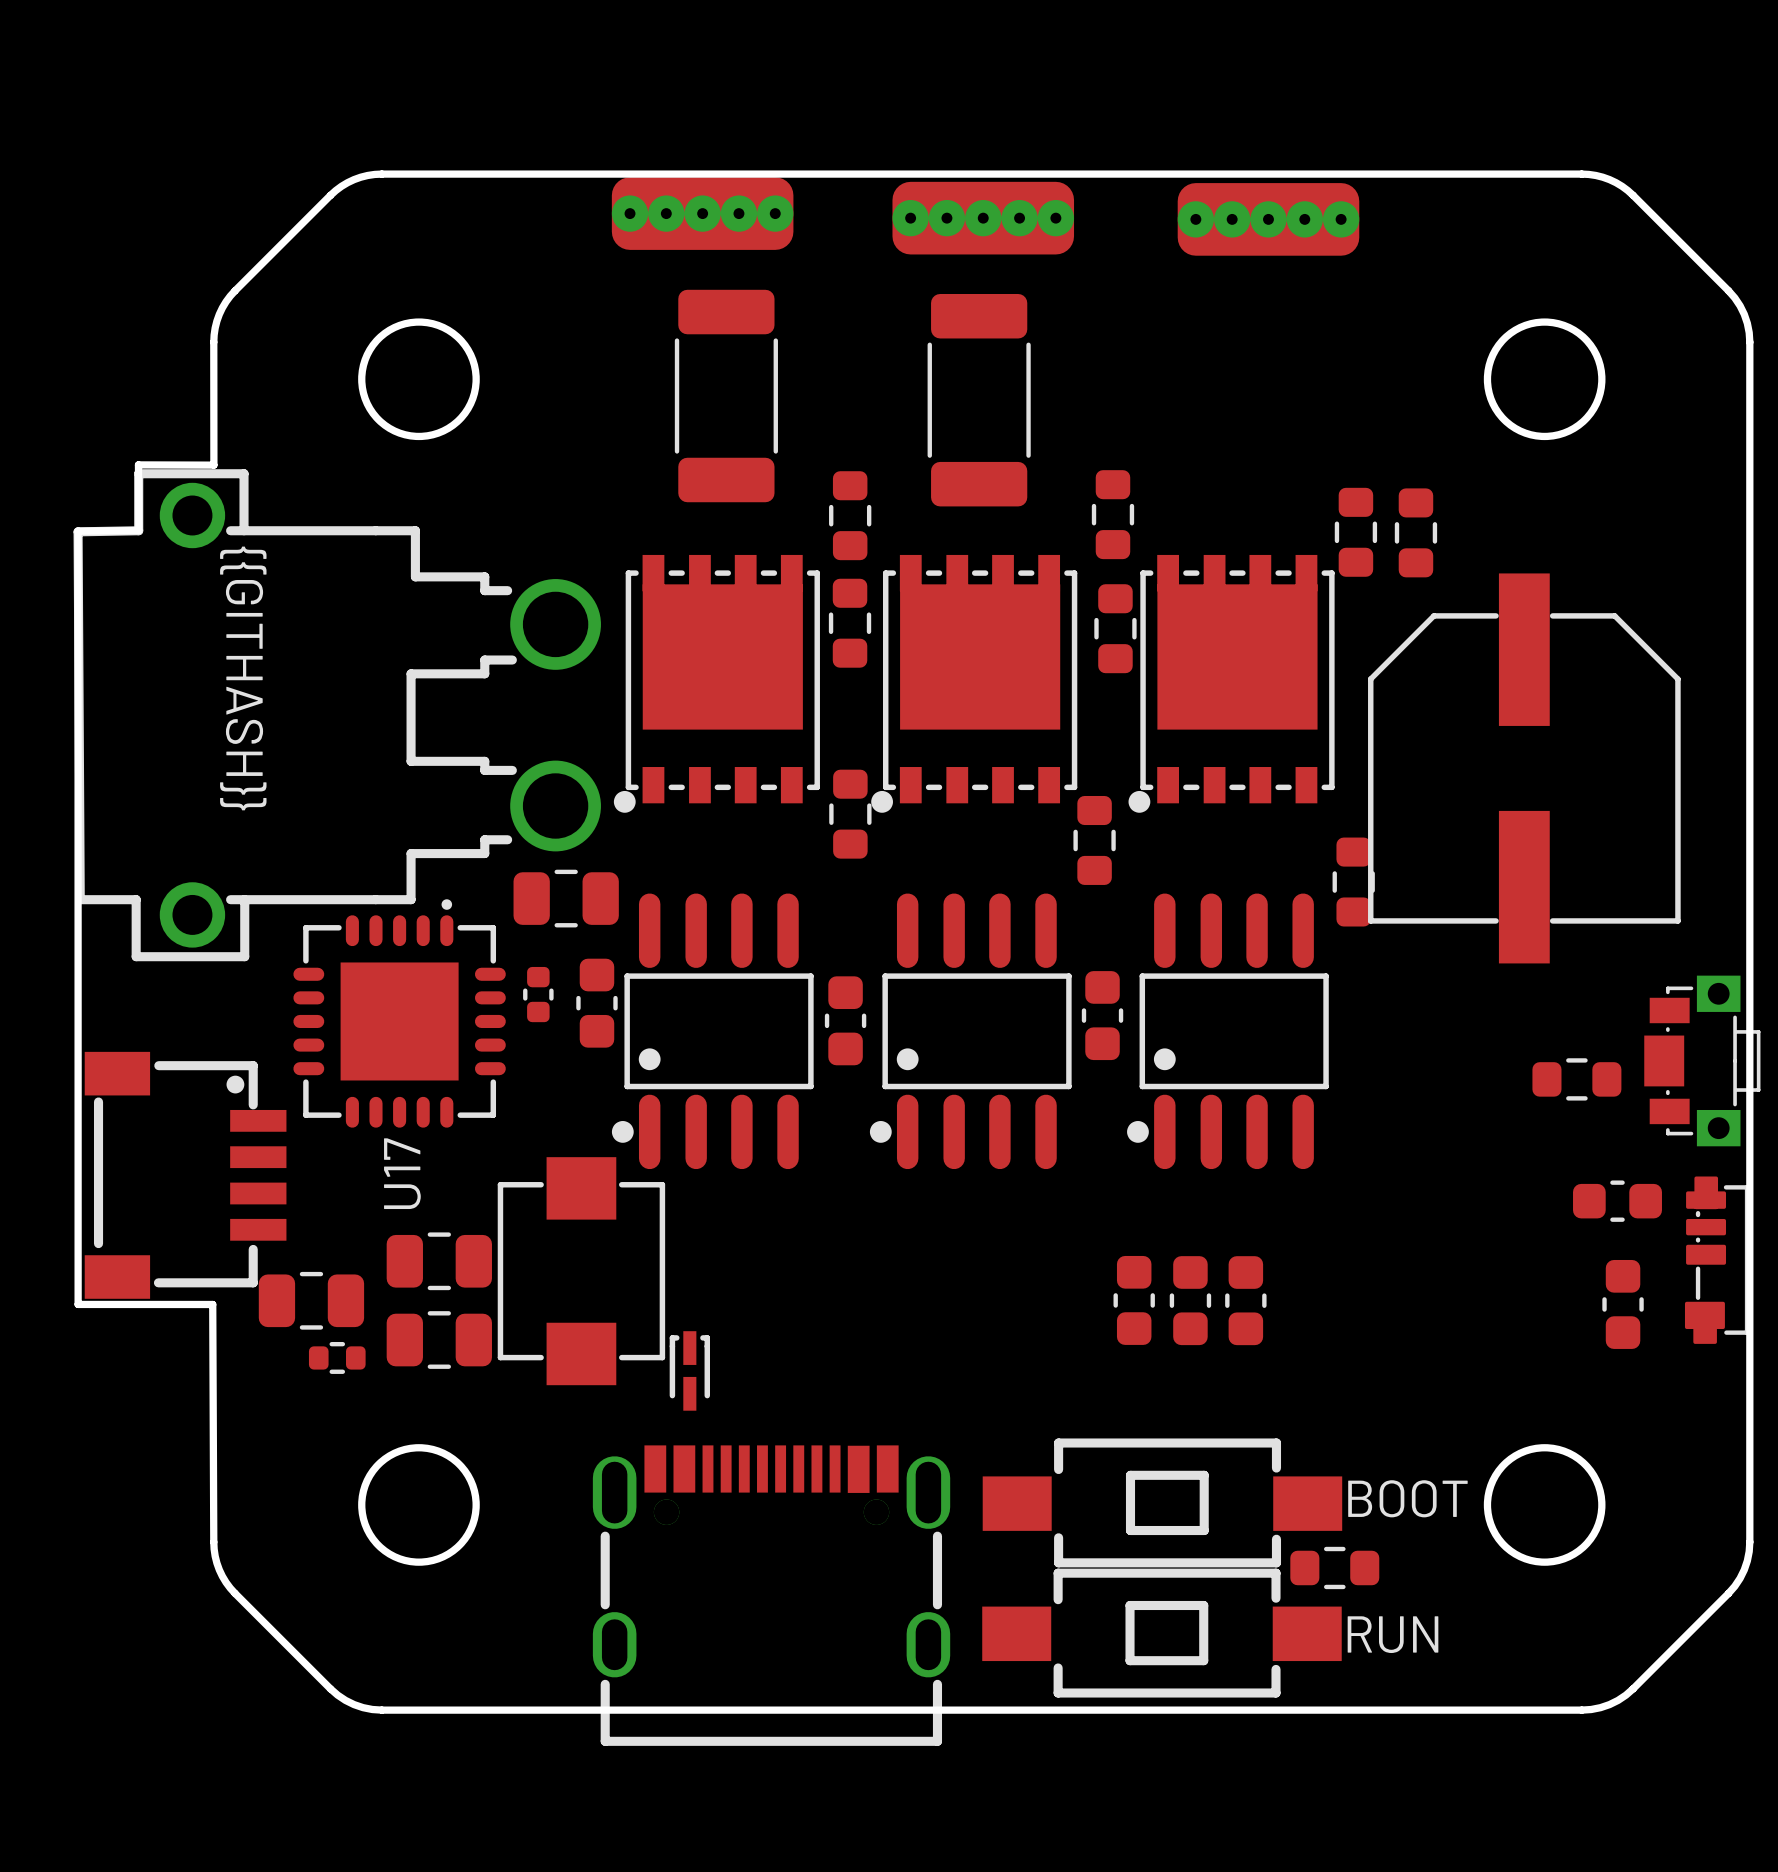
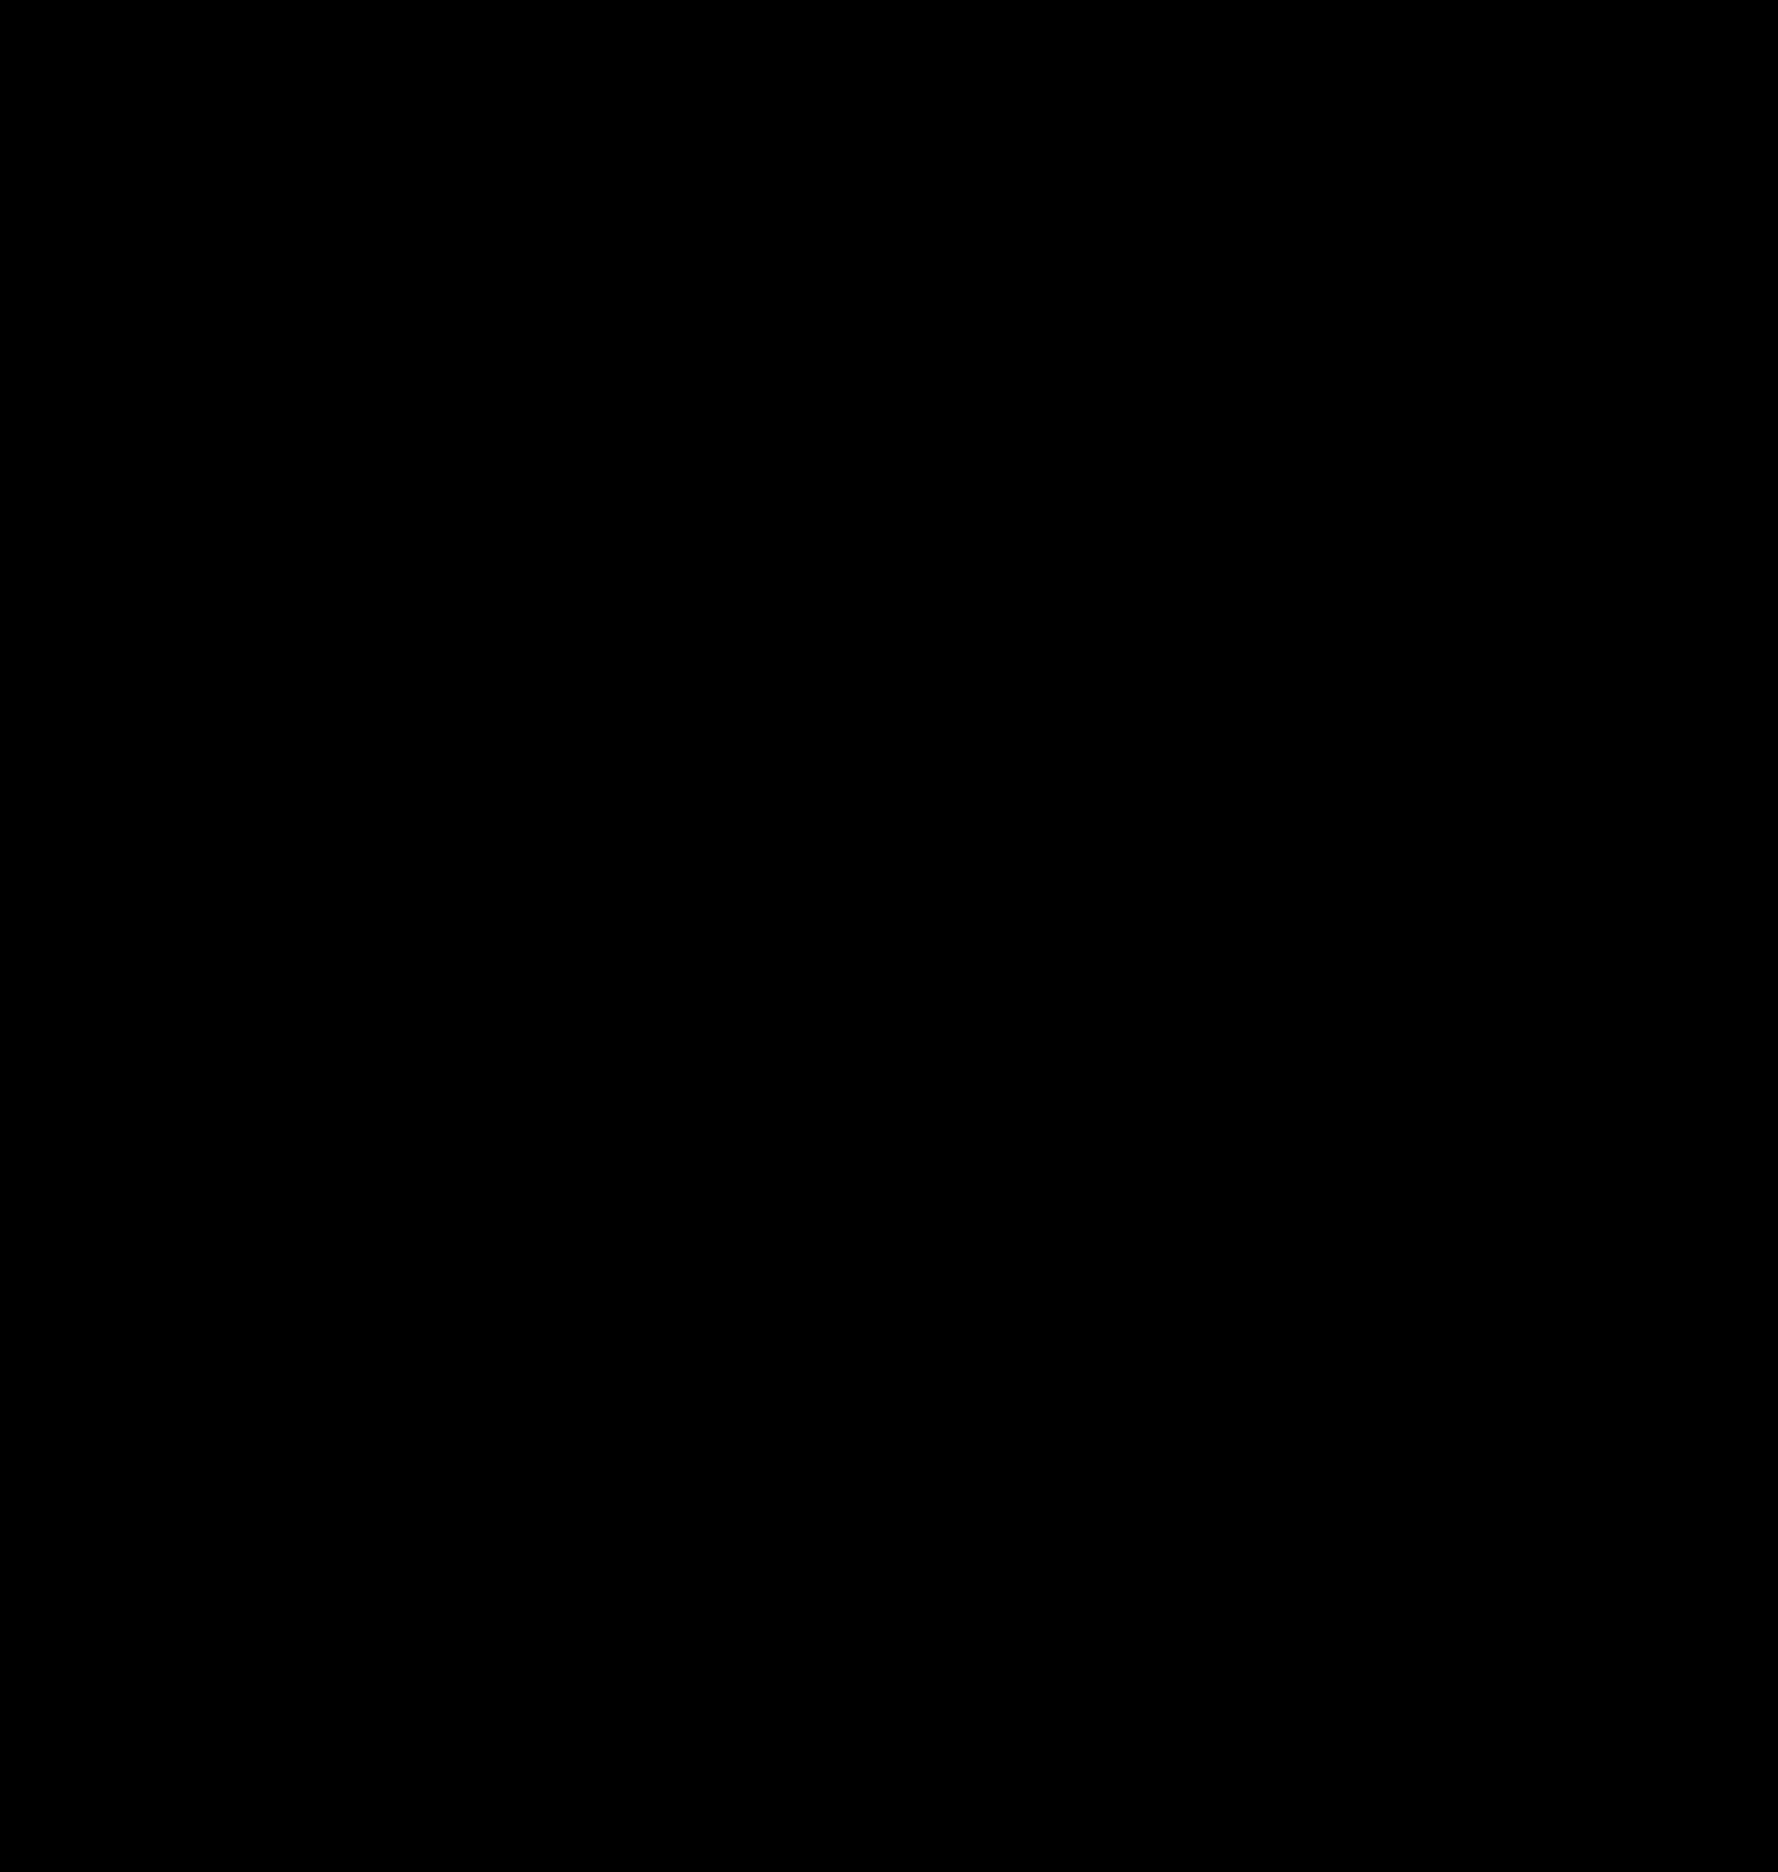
board edge: (381, 174) (1588, 174) (1609, 179) (1627, 190) (1734, 297) (1747, 323) (1749, 342) (1749, 1551) (1744, 1569) (1734, 1586) (1625, 1695) (1609, 1704) (1581, 1710) (372, 1709) (354, 1704) (337, 1695) (230, 1588) (219, 1569) (214, 1549) (212, 1304) (78, 1304) (78, 531) (138, 530) (138, 464) (213, 465) (214, 335) (222, 307) (235, 290) (335, 190) (354, 179) (381, 174) -> none
part: (702, 213) -> none
part: (983, 218) -> none
part: (1268, 219) -> none
round board edge: [358, 318, 480, 441] -> none
round board edge: [1483, 318, 1606, 441] -> none
part: (726, 396) -> none
part: (979, 400) -> none
part: (1112, 514) -> none
part: (850, 515) -> none
part: (1355, 532) -> none
part: (1415, 532) -> none
part: (850, 623) -> none
part: (1115, 628) -> none
text: {{GITHASH}} (243, 678) -> none
part: (716, 683) -> none
part: (974, 683) -> none
part: (1231, 683) -> none
part: (337, 715) -> none
part: (1524, 768) -> none
part: (850, 814) -> none
part: (1094, 840) -> none
part: (1353, 882) -> none
part: (566, 898) -> none
part: (538, 994) -> none
part: (596, 1003) -> none
part: (399, 1013) -> none
part: (1102, 1015) -> none
part: (845, 1020) -> none
part: (712, 1031) -> none
part: (970, 1031) -> none
part: (1227, 1031) -> none
part: (1702, 1060) -> none
part: (1576, 1079) -> none
U17: (185, 1175) -> none
part: (1617, 1201) -> none
part: (1717, 1260) -> none
part: (439, 1261) -> none
part: (581, 1271) -> none
part: (311, 1300) -> none
part: (1134, 1300) -> none
part: (1190, 1300) -> none
part: (1245, 1300) -> none
part: (1623, 1304) -> none
part: (439, 1340) -> none
part: (337, 1357) -> none
part: (689, 1370) -> none
round board edge: [358, 1444, 480, 1566] -> none
round board edge: [1483, 1444, 1606, 1566] -> none
text: BOOT (1407, 1498) -> none
part: (1162, 1502) -> none
part: (1334, 1567) -> none
part: (771, 1595) -> none
part: (1161, 1633) -> none
text: RUN (1393, 1634) -> none

